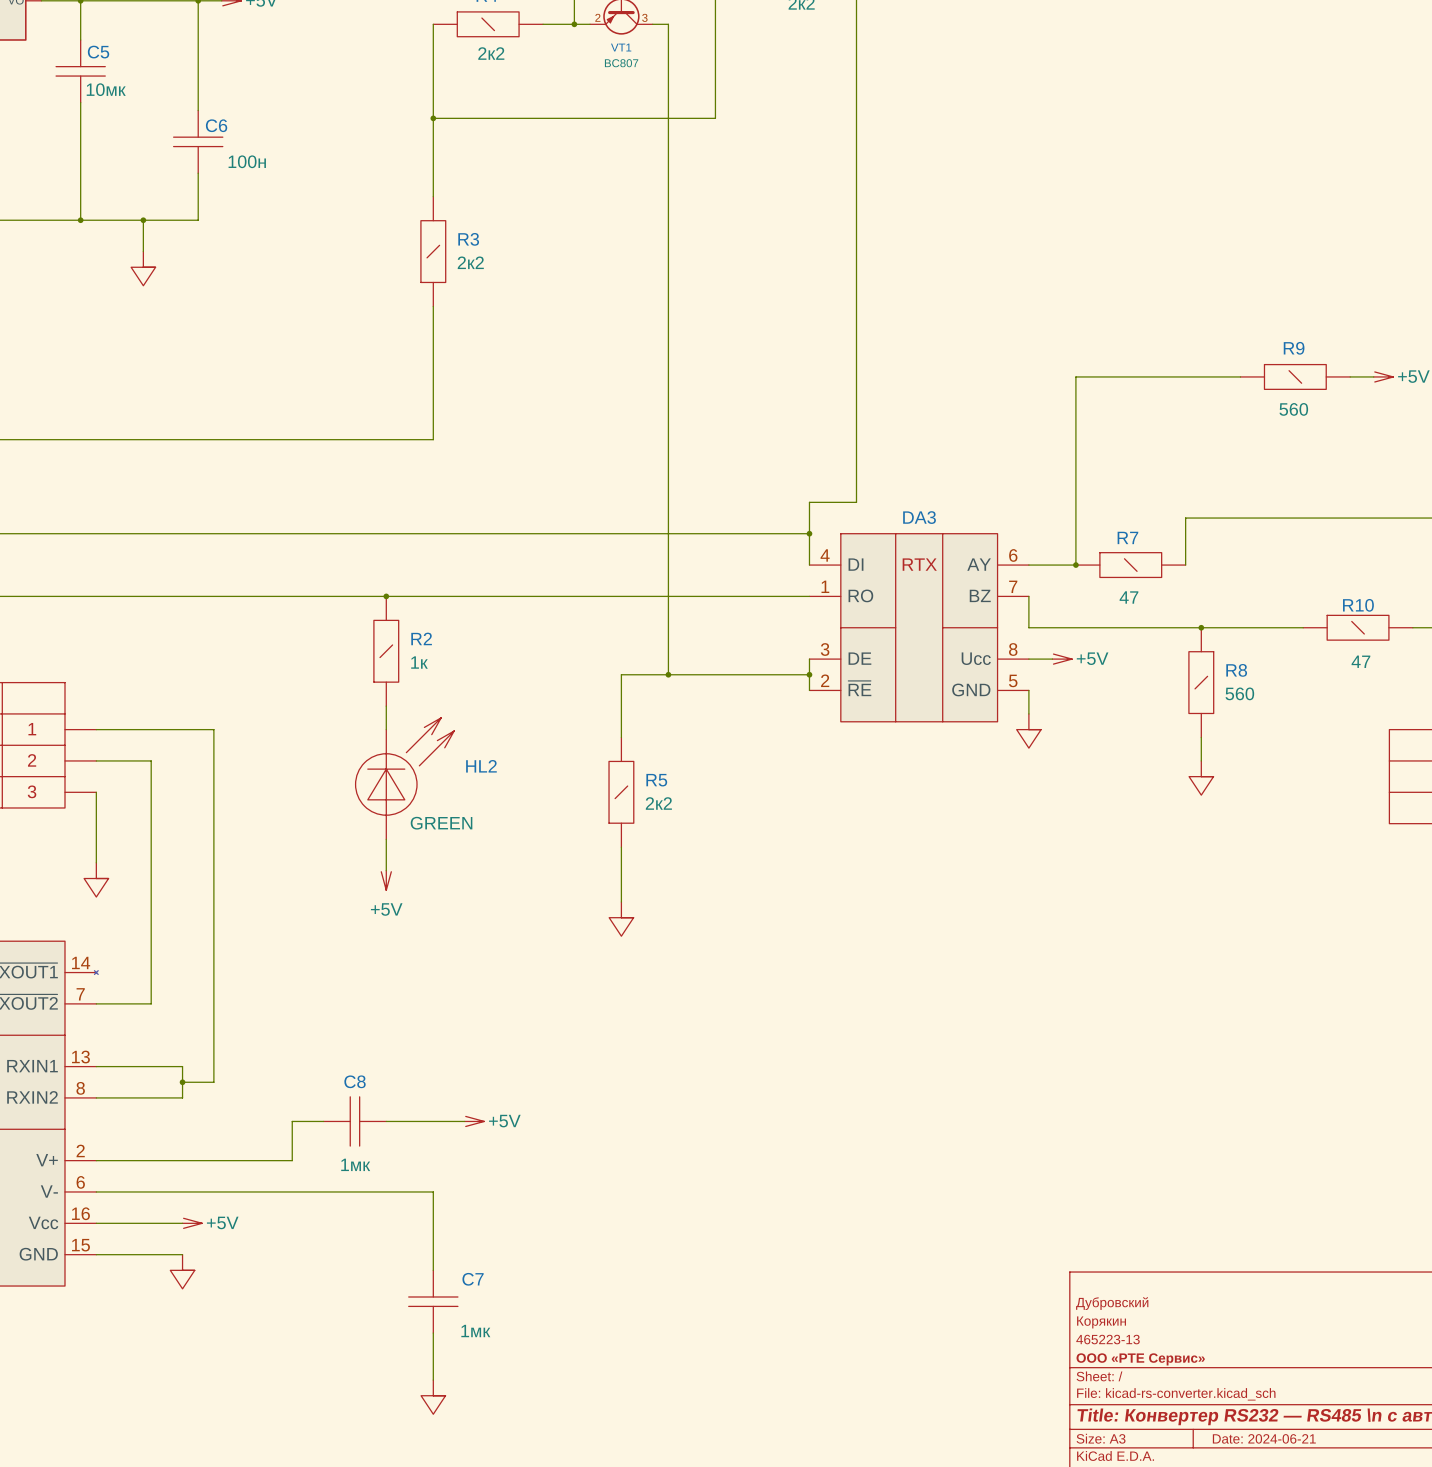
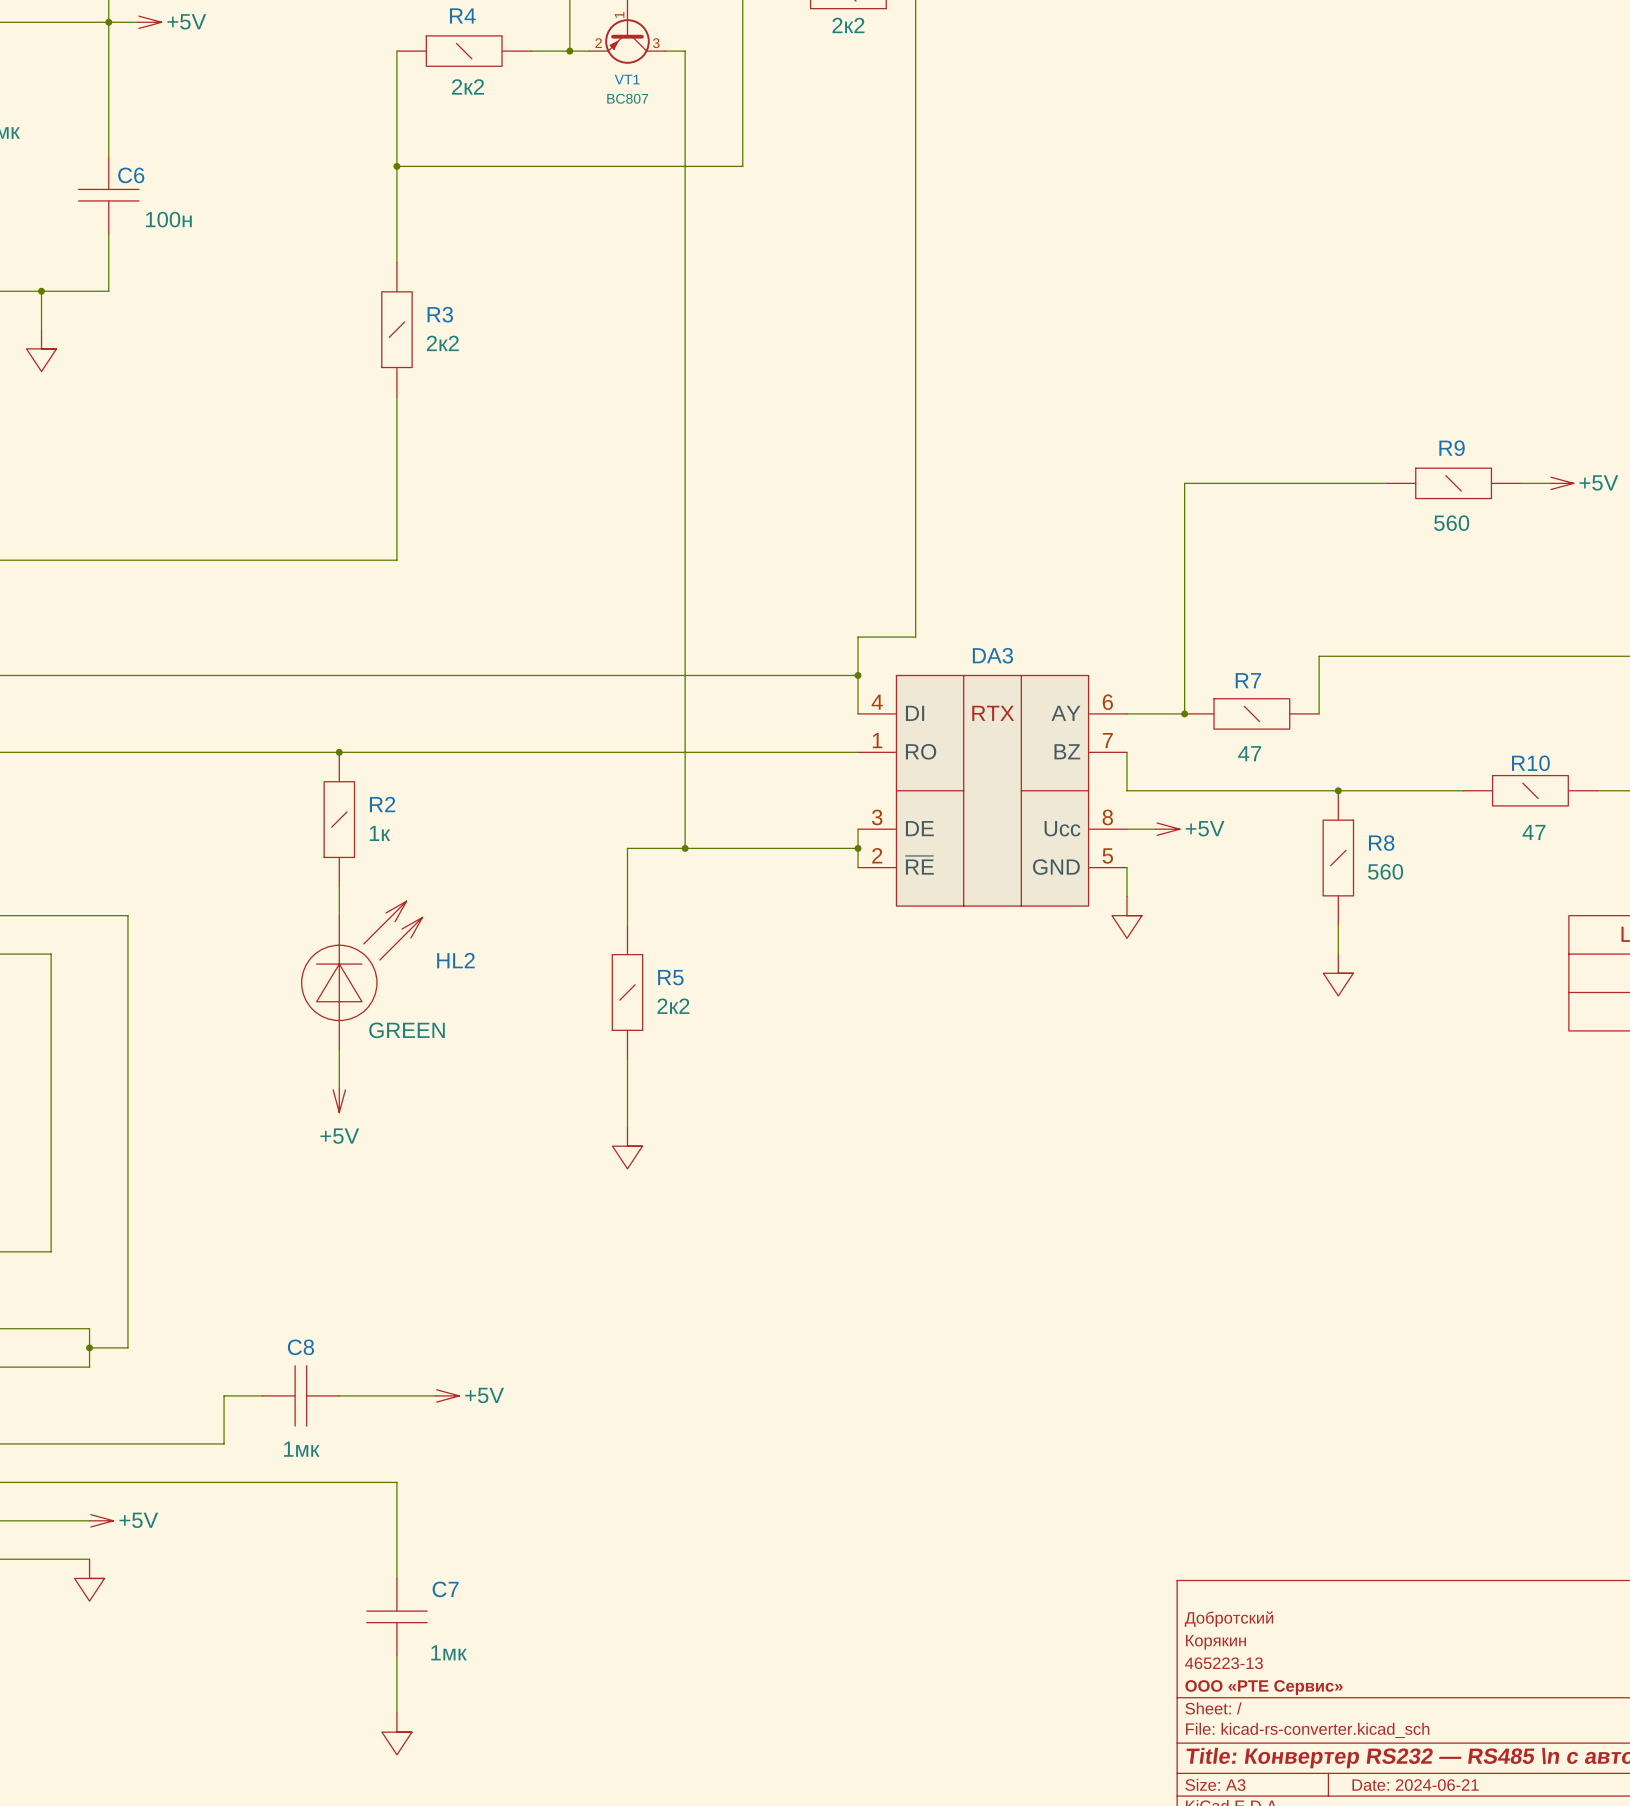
title block: Дубровский (1112, 1303) -> Добротский (1228, 1619)

